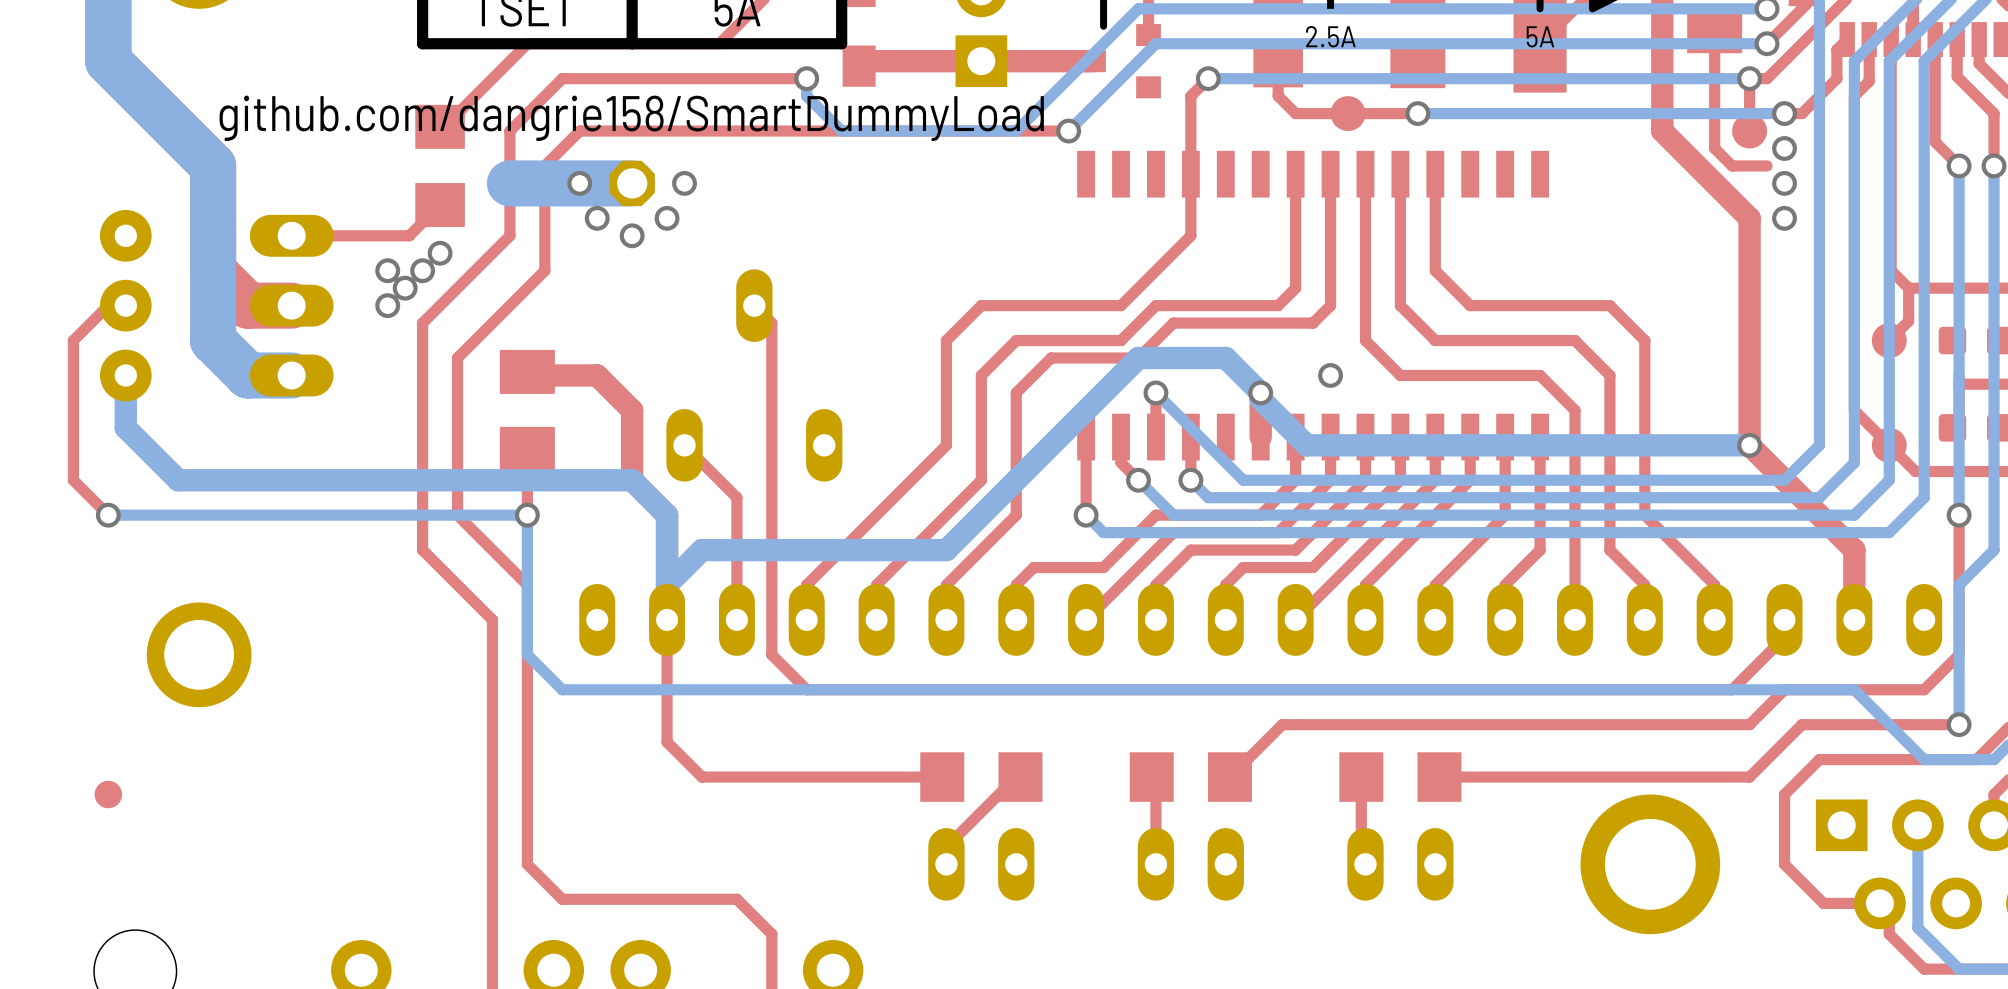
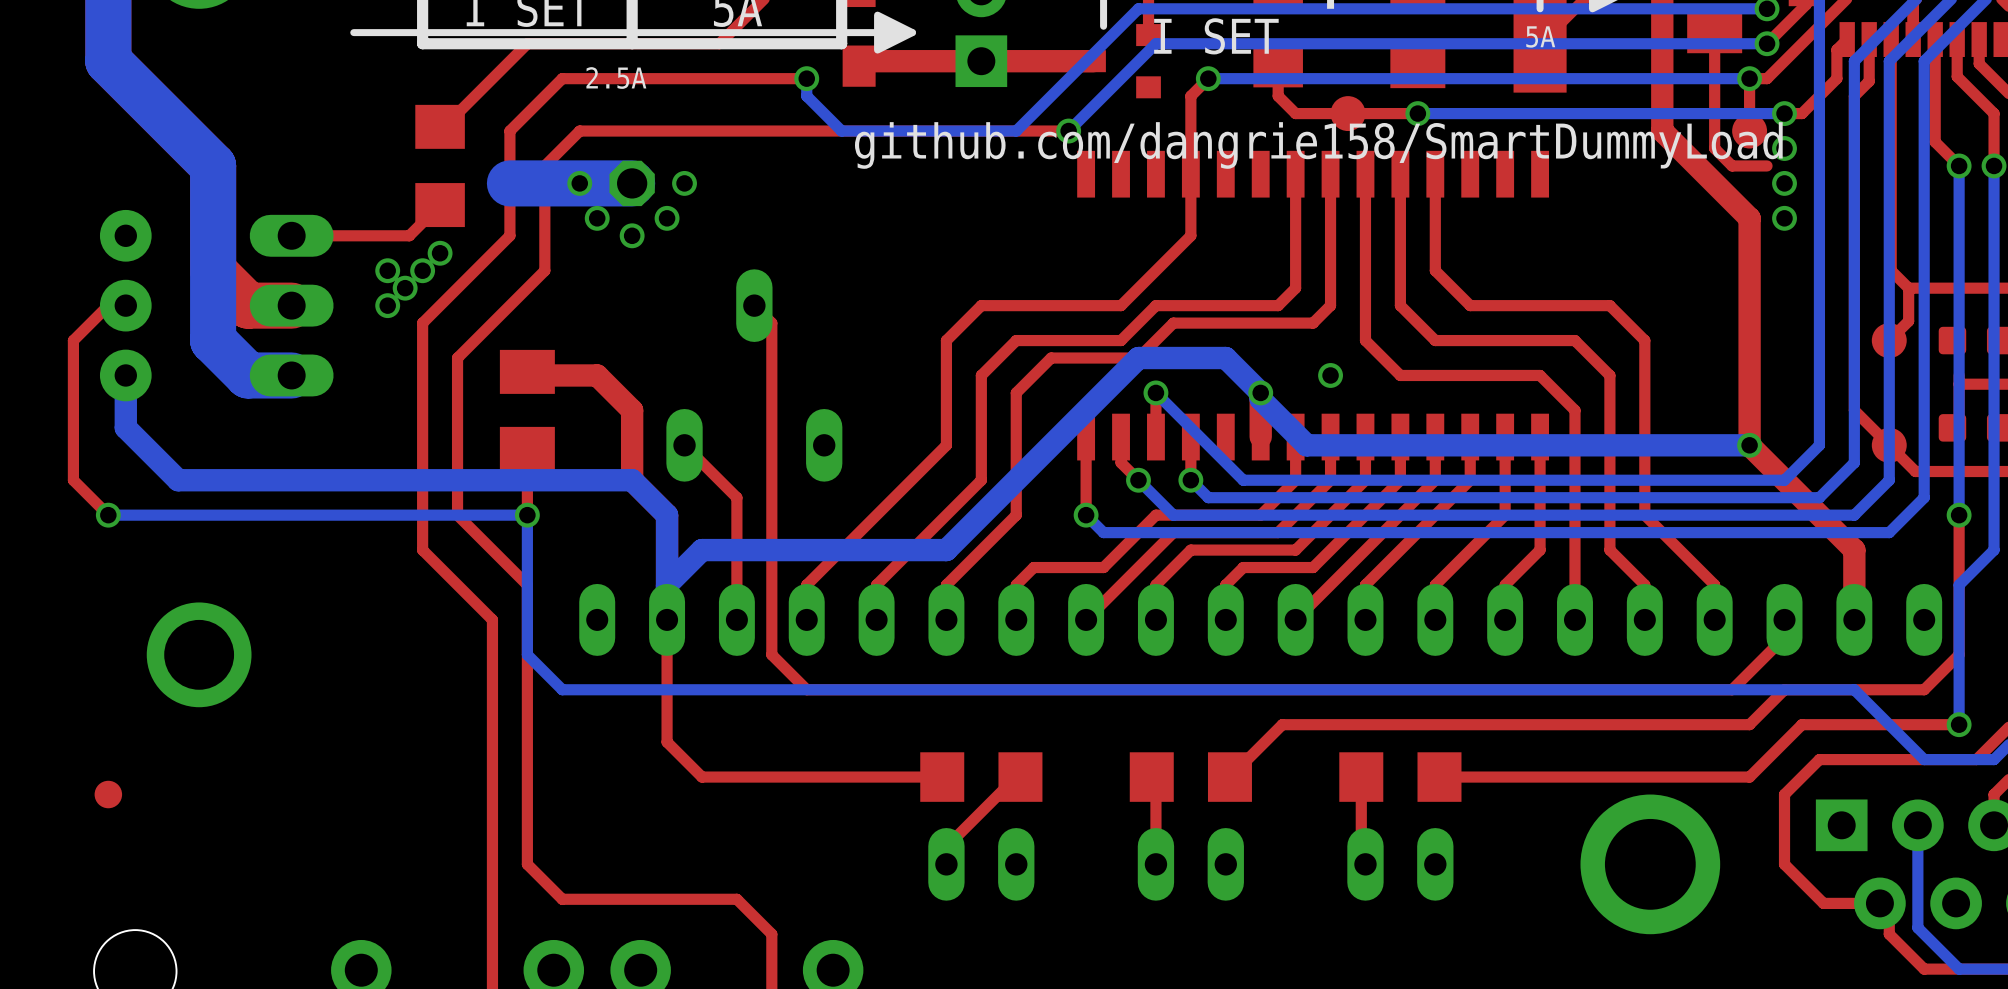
drawing: none -> [874, 11, 916, 54]
line: none -> (912, 32) (353, 32)
text: none -> I SET (1216, 36)
text: 2.5A (1330, 36) -> none
text: none -> 2.5A (616, 78)
text: github.com/dangrie158/SmartDummyLoad (631, 118) -> none
text: none -> github.com/dangrie158/SmartDummyLoad (1318, 145)

